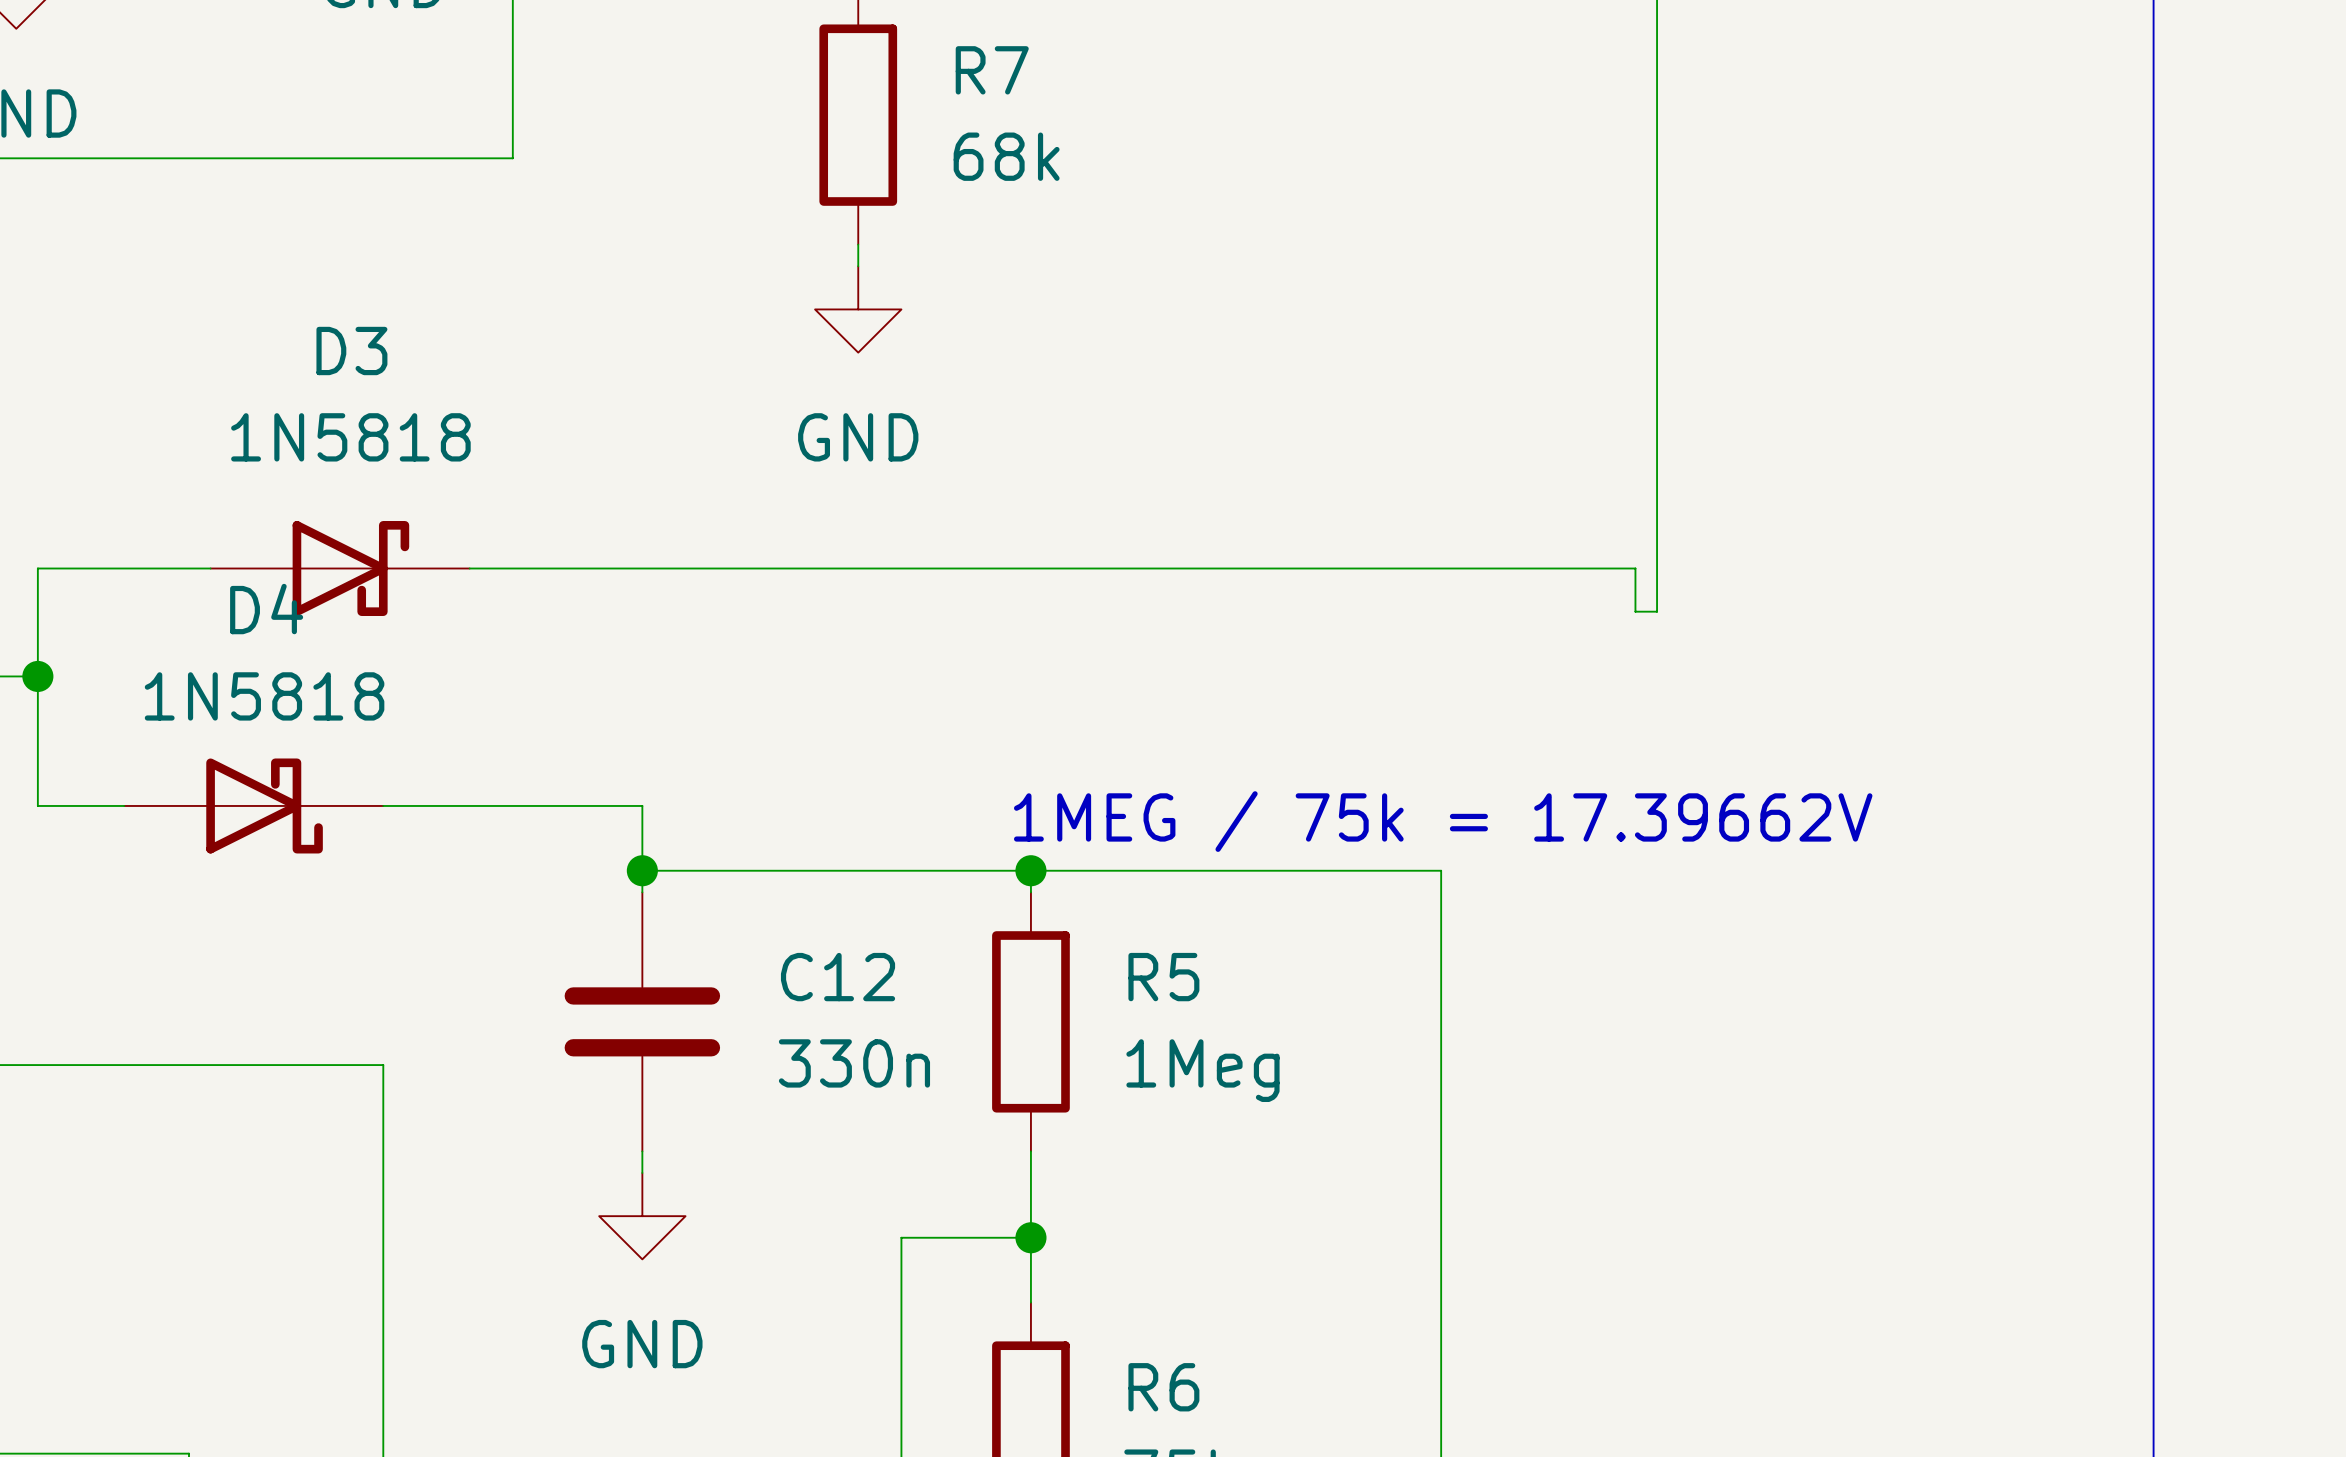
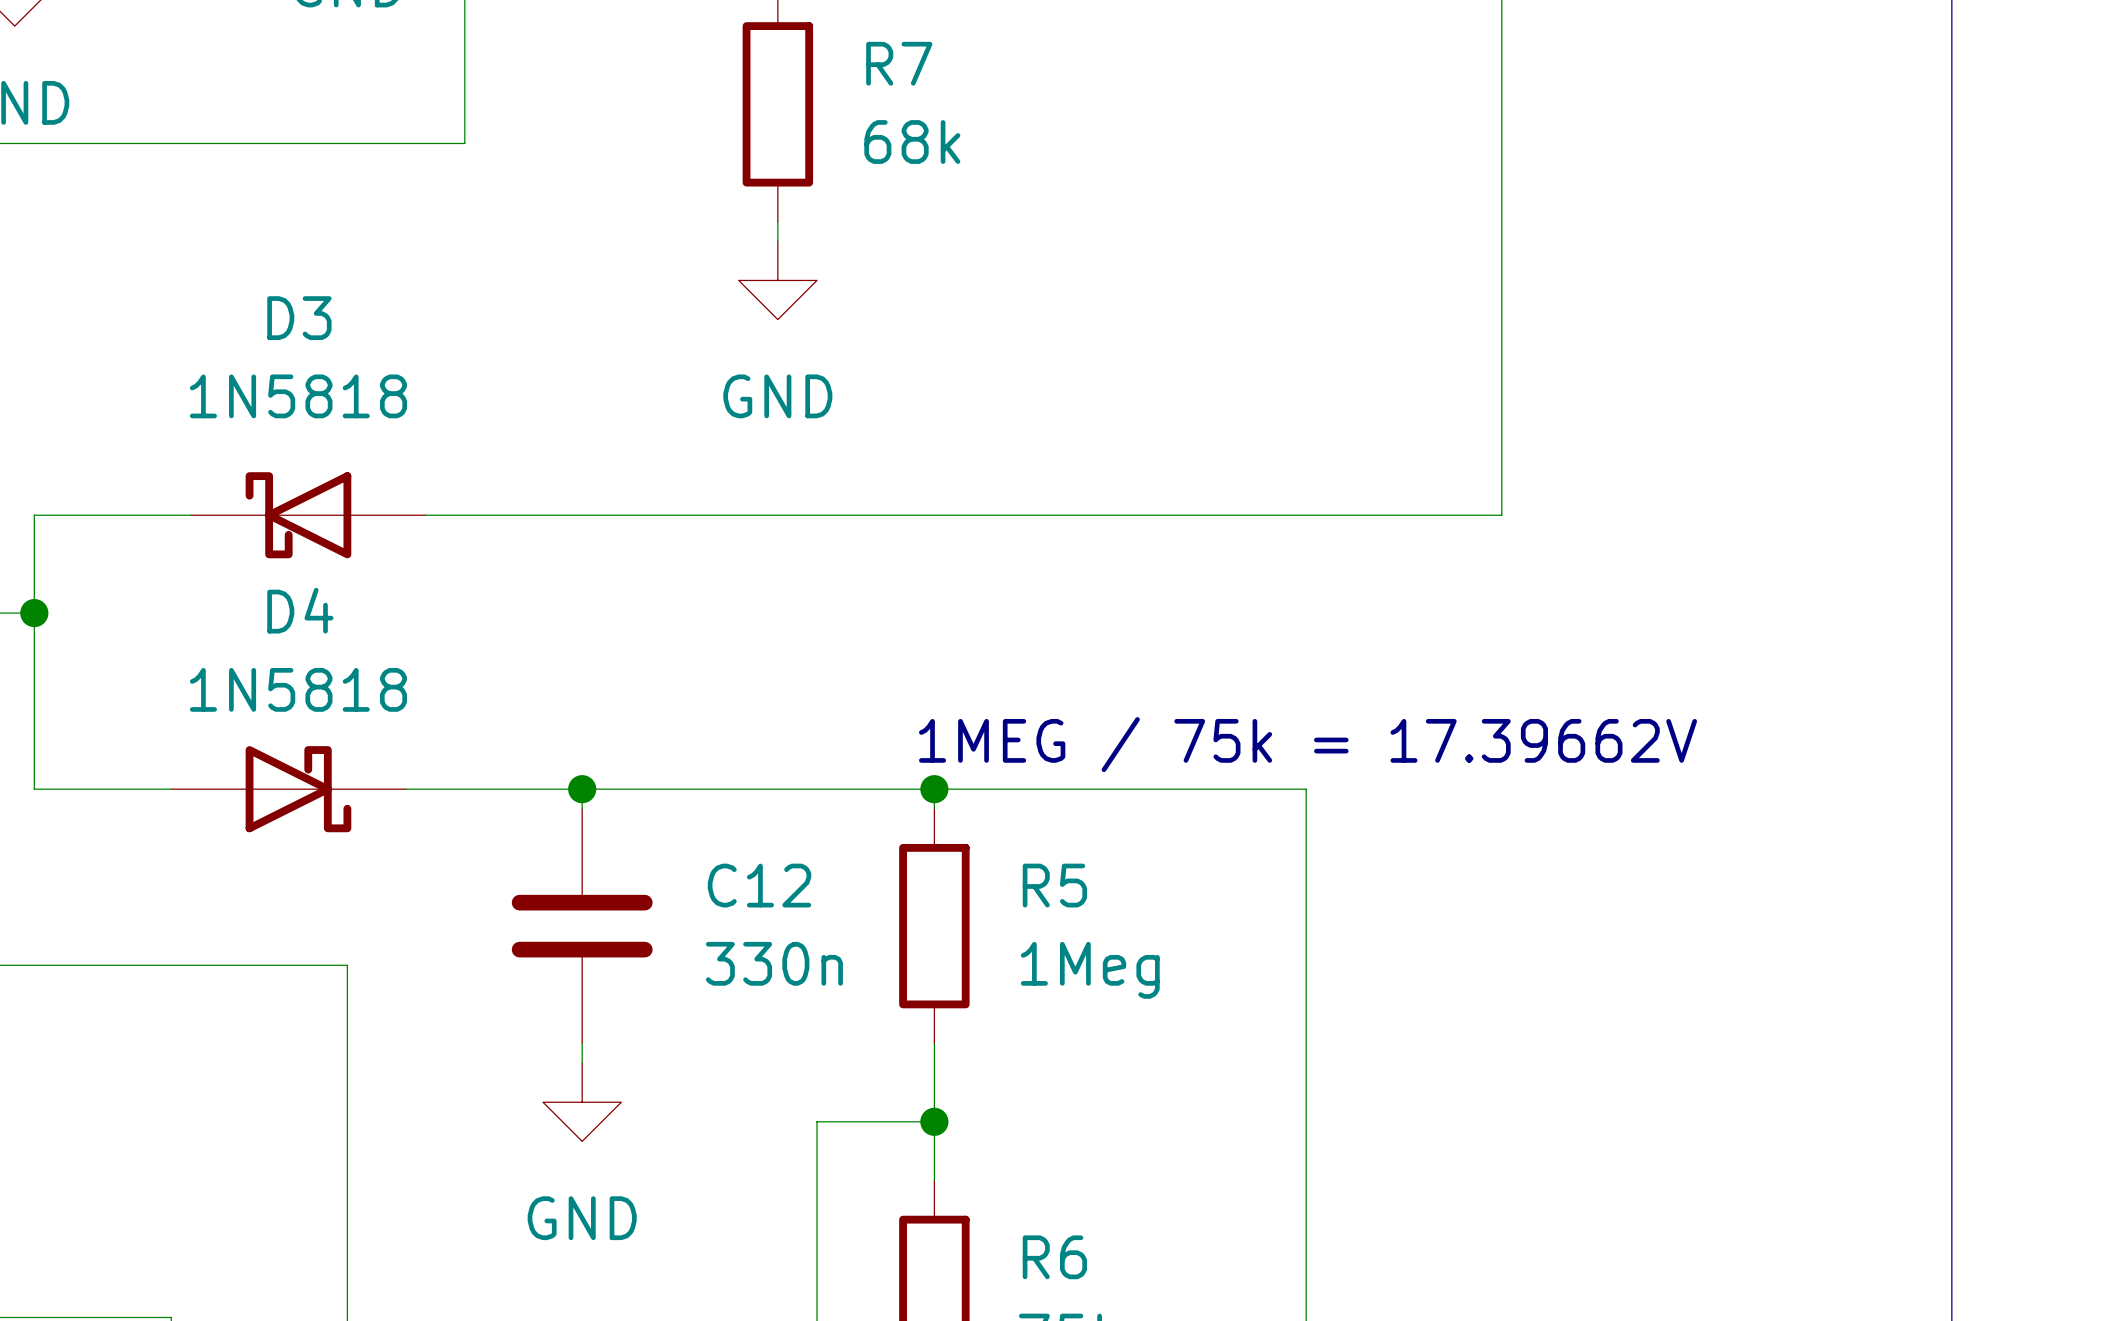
D3 flip: as is (350, 568) -> left-right (298, 515)
wire: (1635, 568) (1635, 611) (1657, 611) (1657, 568) -> (1482, 515) (1501, 515)
wire: (37, 805) (124, 805) -> (34, 730) (34, 789) (171, 789)
D4 position: (253, 805) -> (288, 789)
wire: (383, 805) (642, 805) (642, 870) -> (406, 789) (582, 789)

